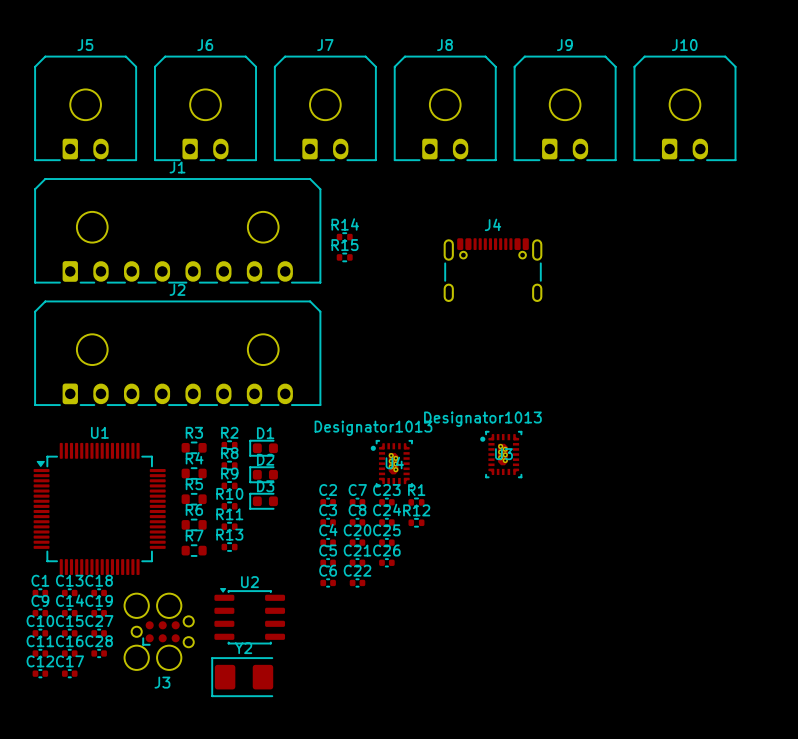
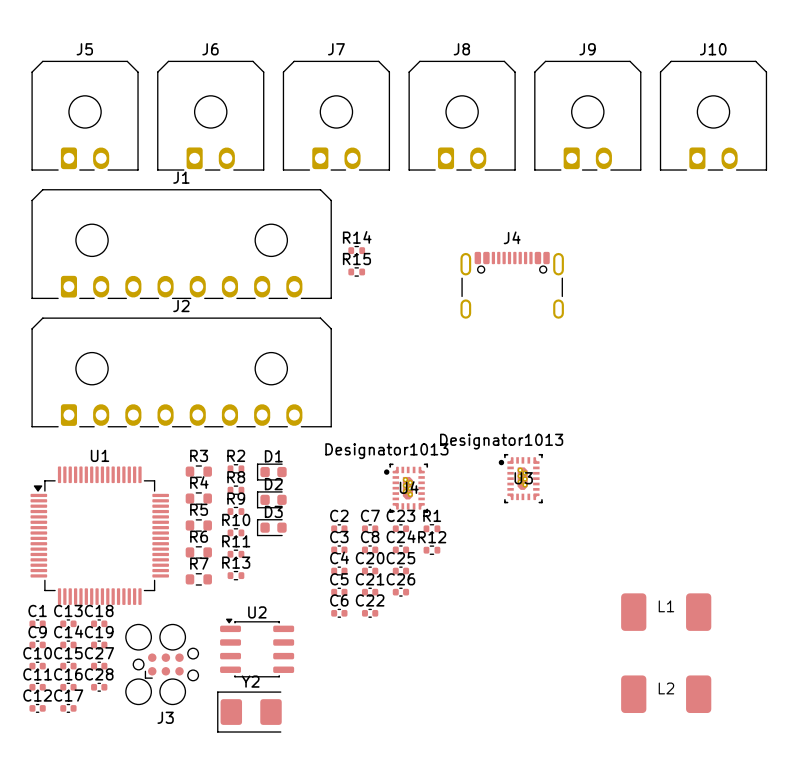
L1: none -> (666, 612)
L2: none -> (666, 694)

